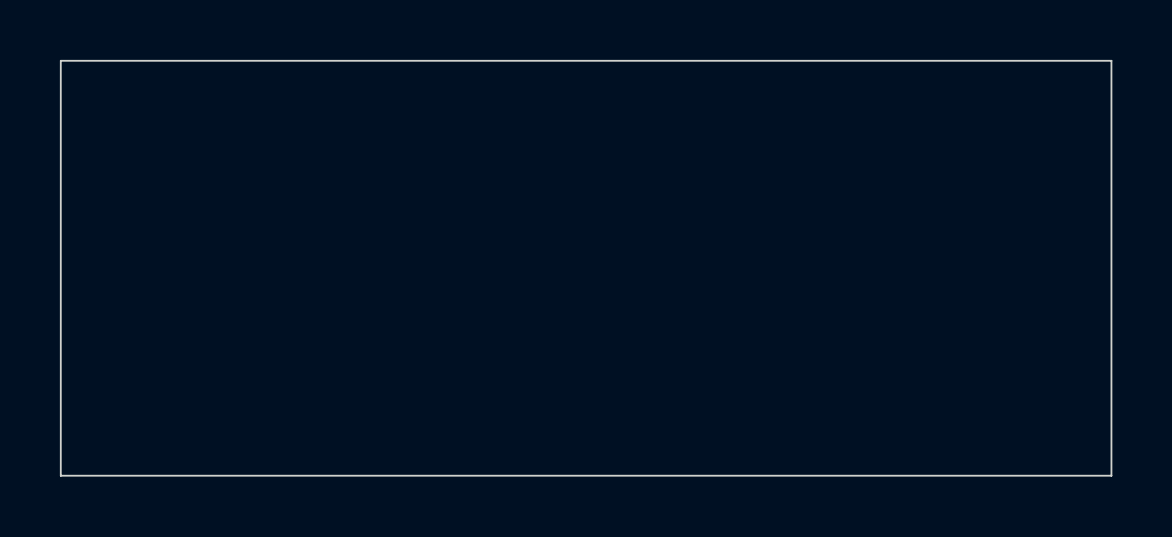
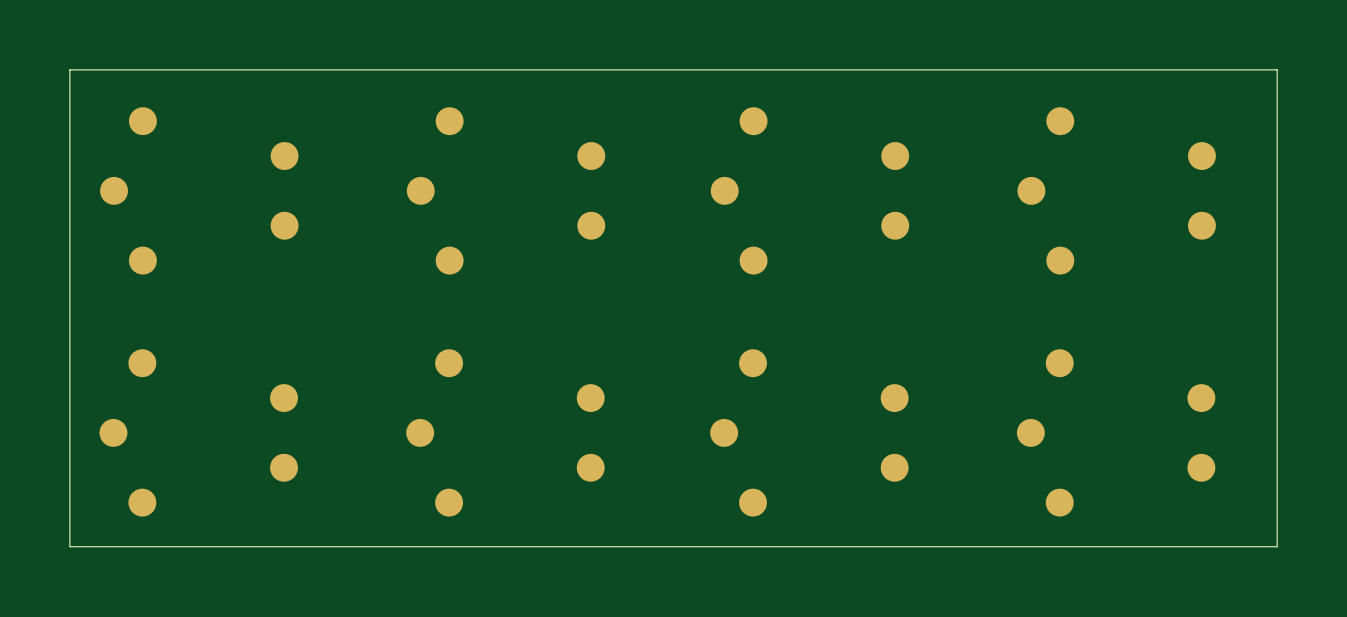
part: none -> (128, 190)
part: none -> (284, 190)
part: none -> (435, 190)
part: none -> (591, 190)
part: none -> (739, 190)
part: none -> (895, 190)
part: none -> (1045, 190)
part: none -> (1201, 190)
part: none -> (127, 432)
part: none -> (284, 432)
part: none -> (434, 432)
part: none -> (590, 432)
part: none -> (738, 432)
part: none -> (894, 432)
part: none -> (1045, 432)
part: none -> (1201, 432)

